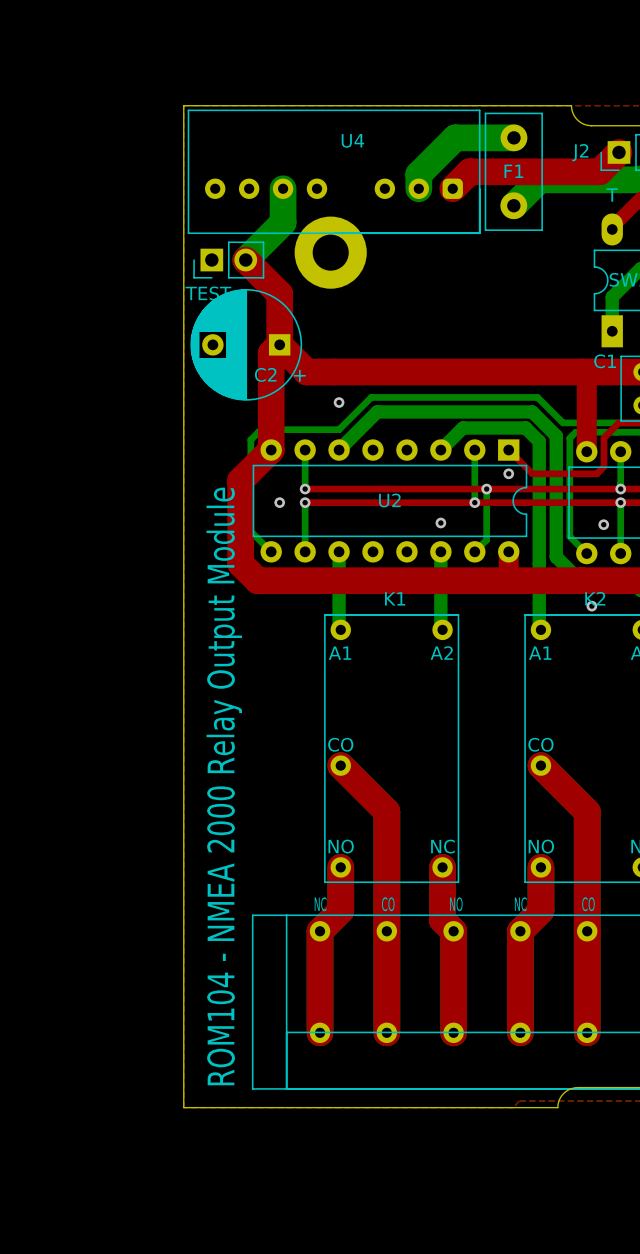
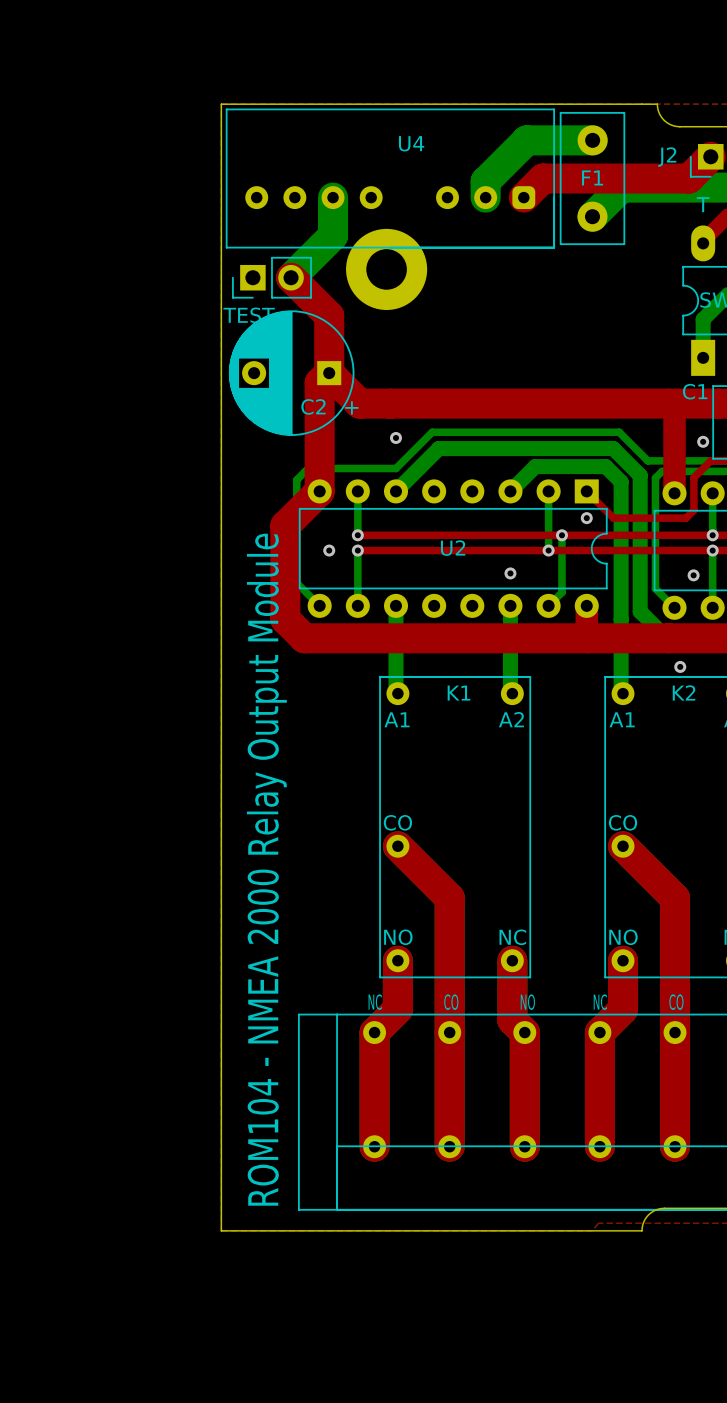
via: none -> (703, 441)
K1 name position: K1 (395, 598) -> K1 (459, 693)
K2 name position: K2 (595, 598) -> K2 (684, 692)

